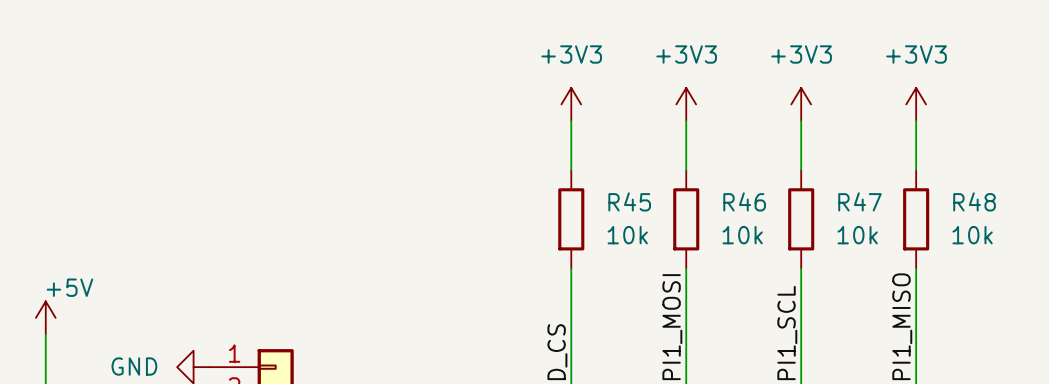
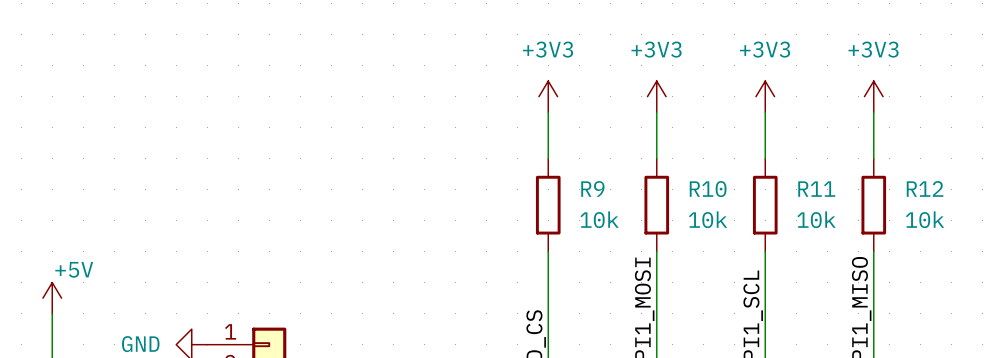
R45 name: R45 (629, 201) -> R9 (592, 188)
R46 name: R46 (744, 201) -> R10 (708, 189)
R47 name: R47 (859, 201) -> R11 (816, 189)
R48 name: R48 (974, 201) -> R12 (925, 188)

